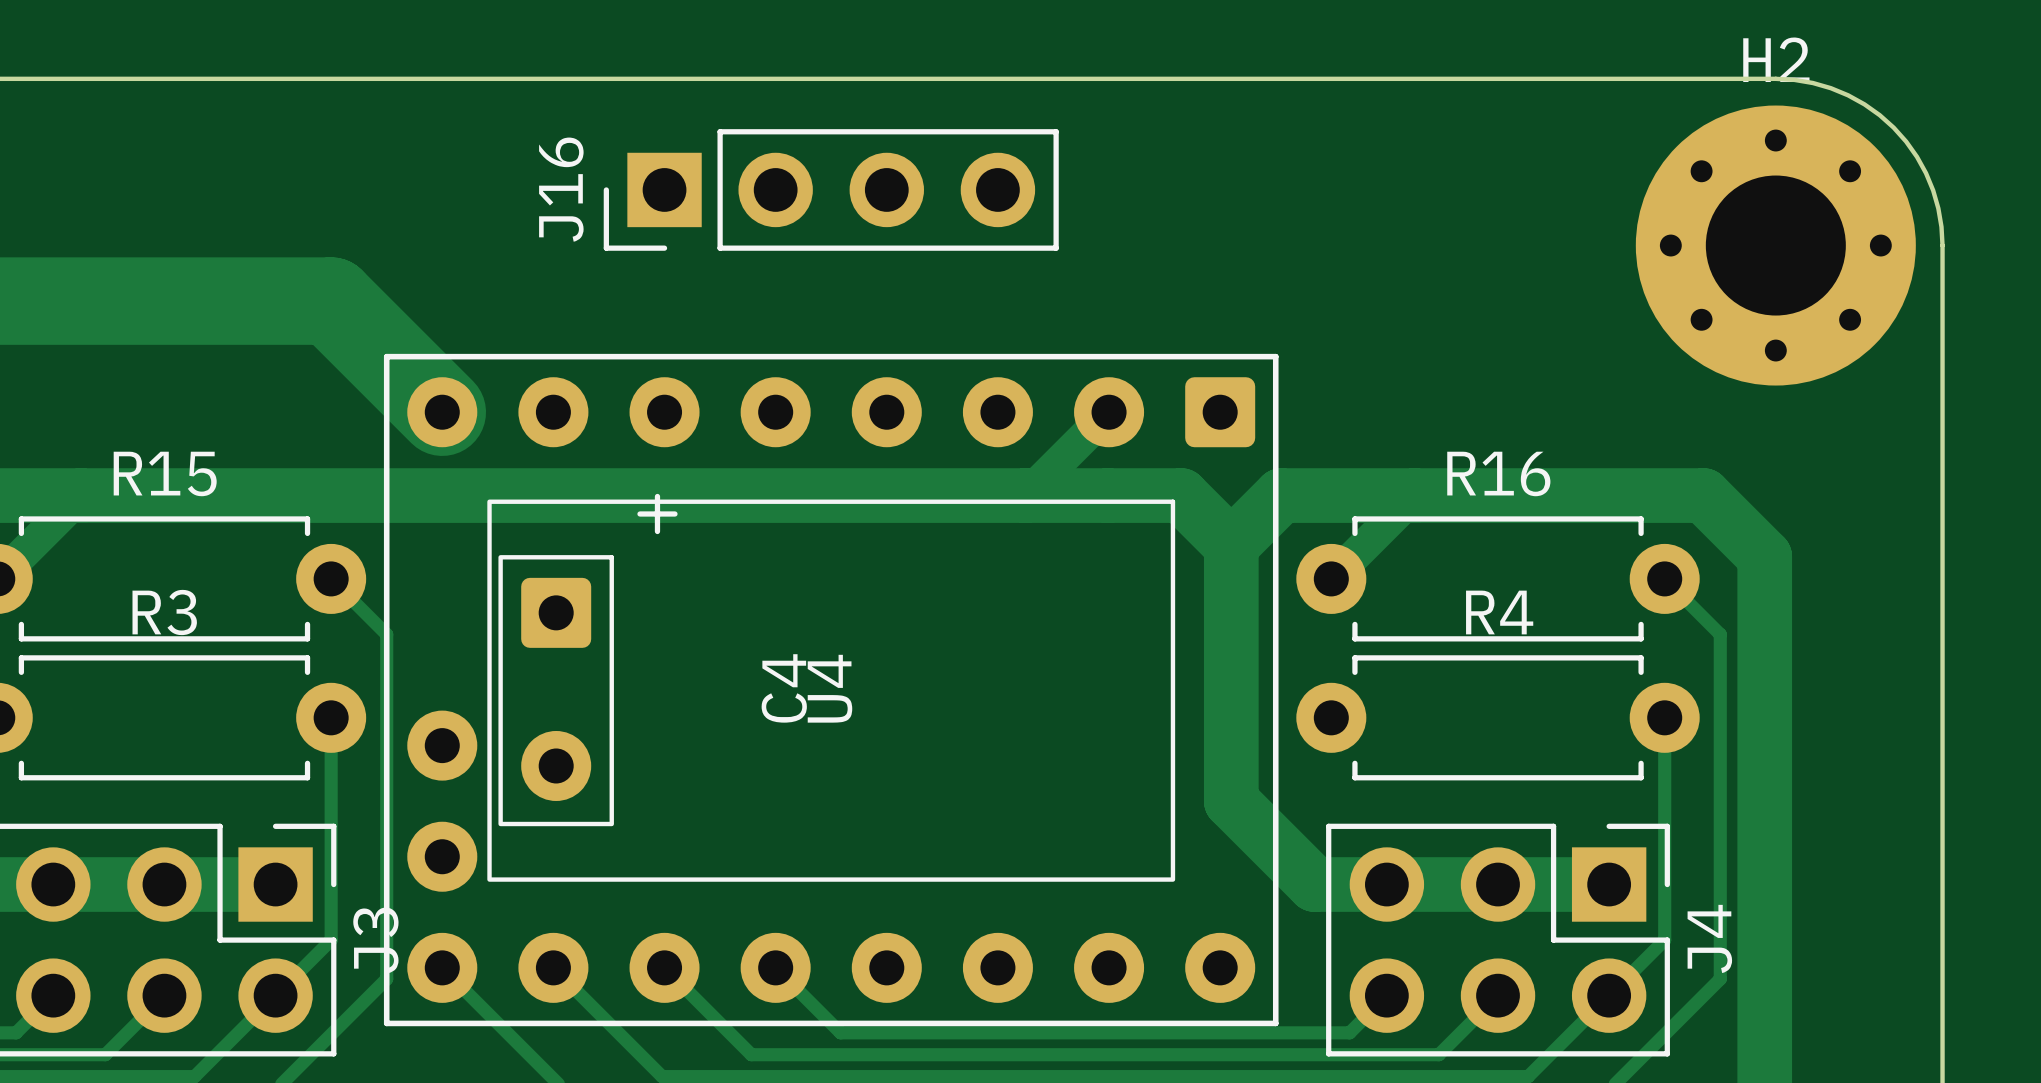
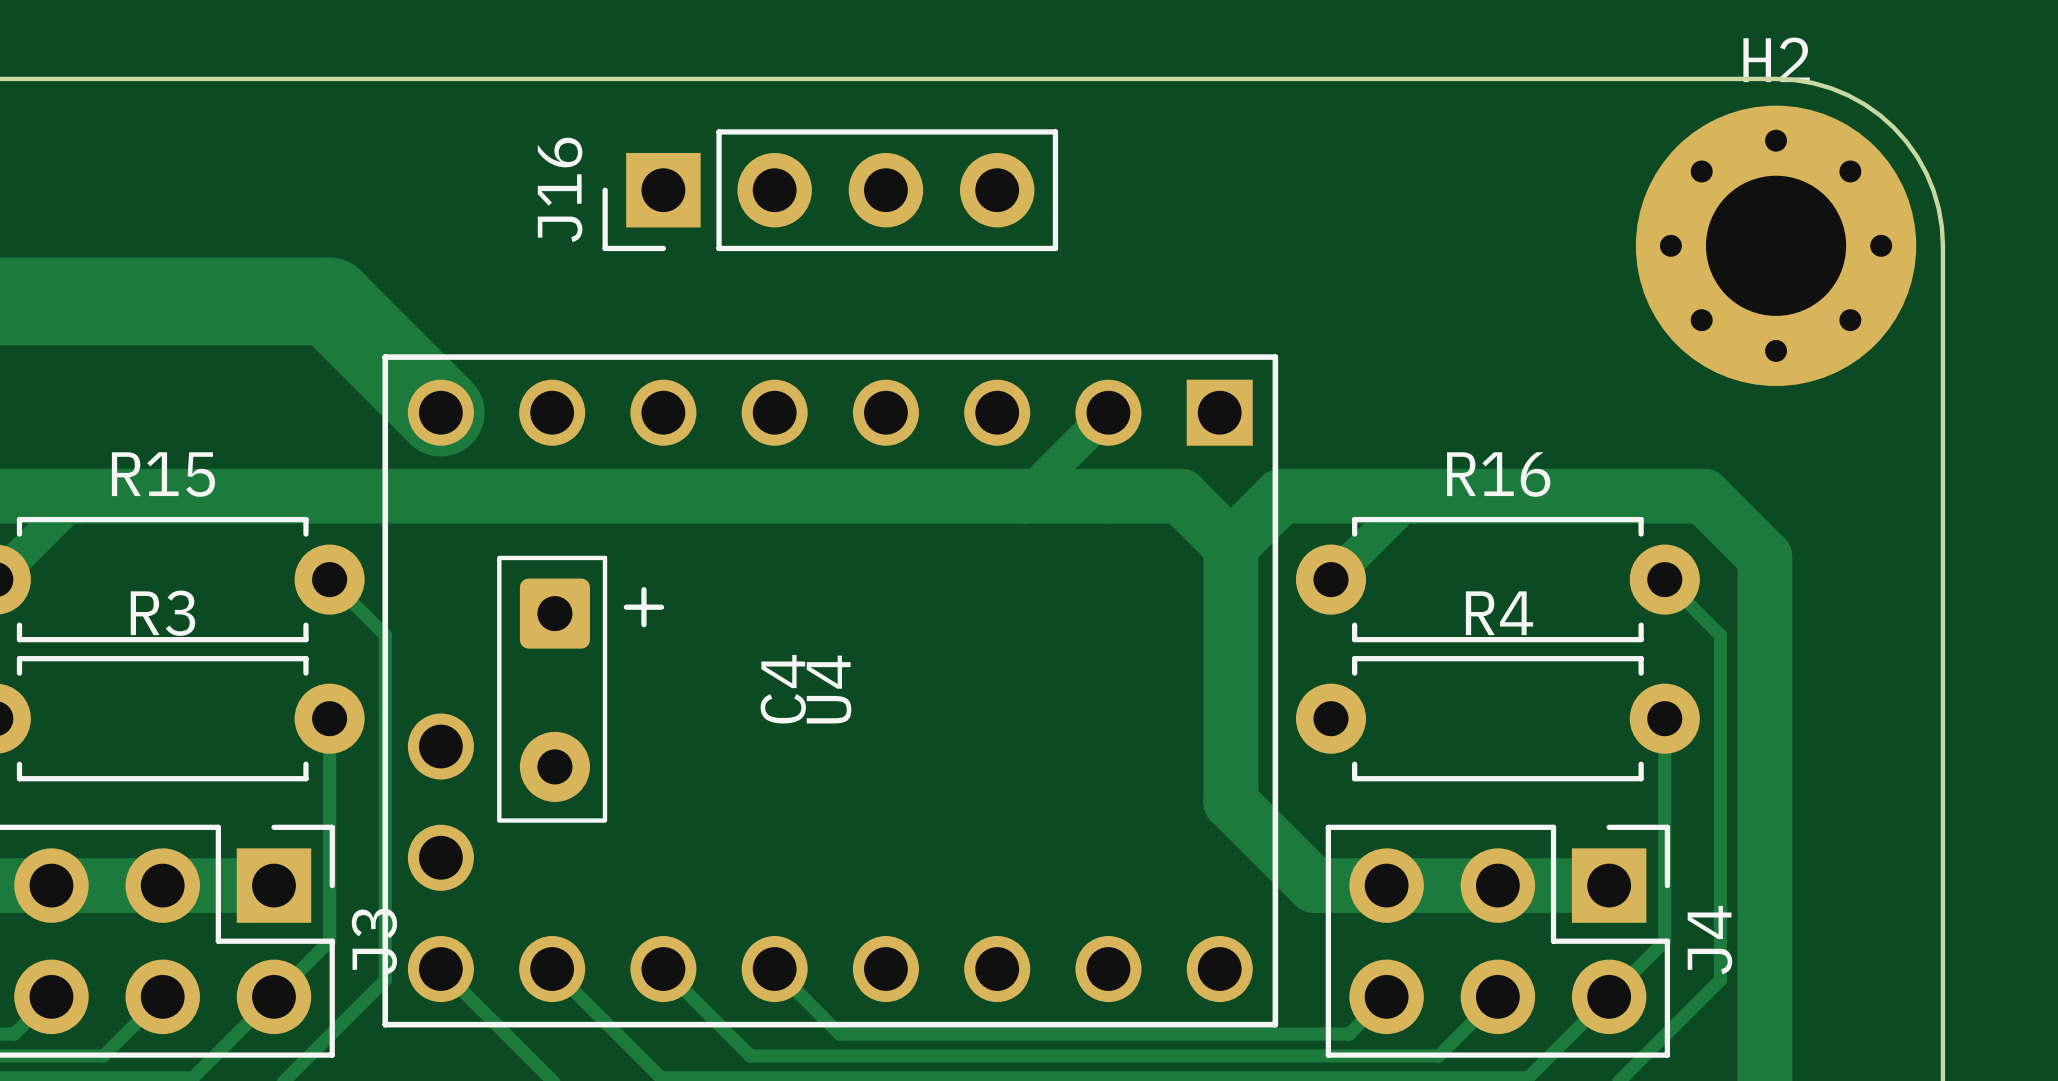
U4 footprint: [383, 353, 1279, 1027] -> [382, 354, 1279, 1028]
C4 footprint: [487, 493, 1176, 882] -> [497, 555, 665, 823]

